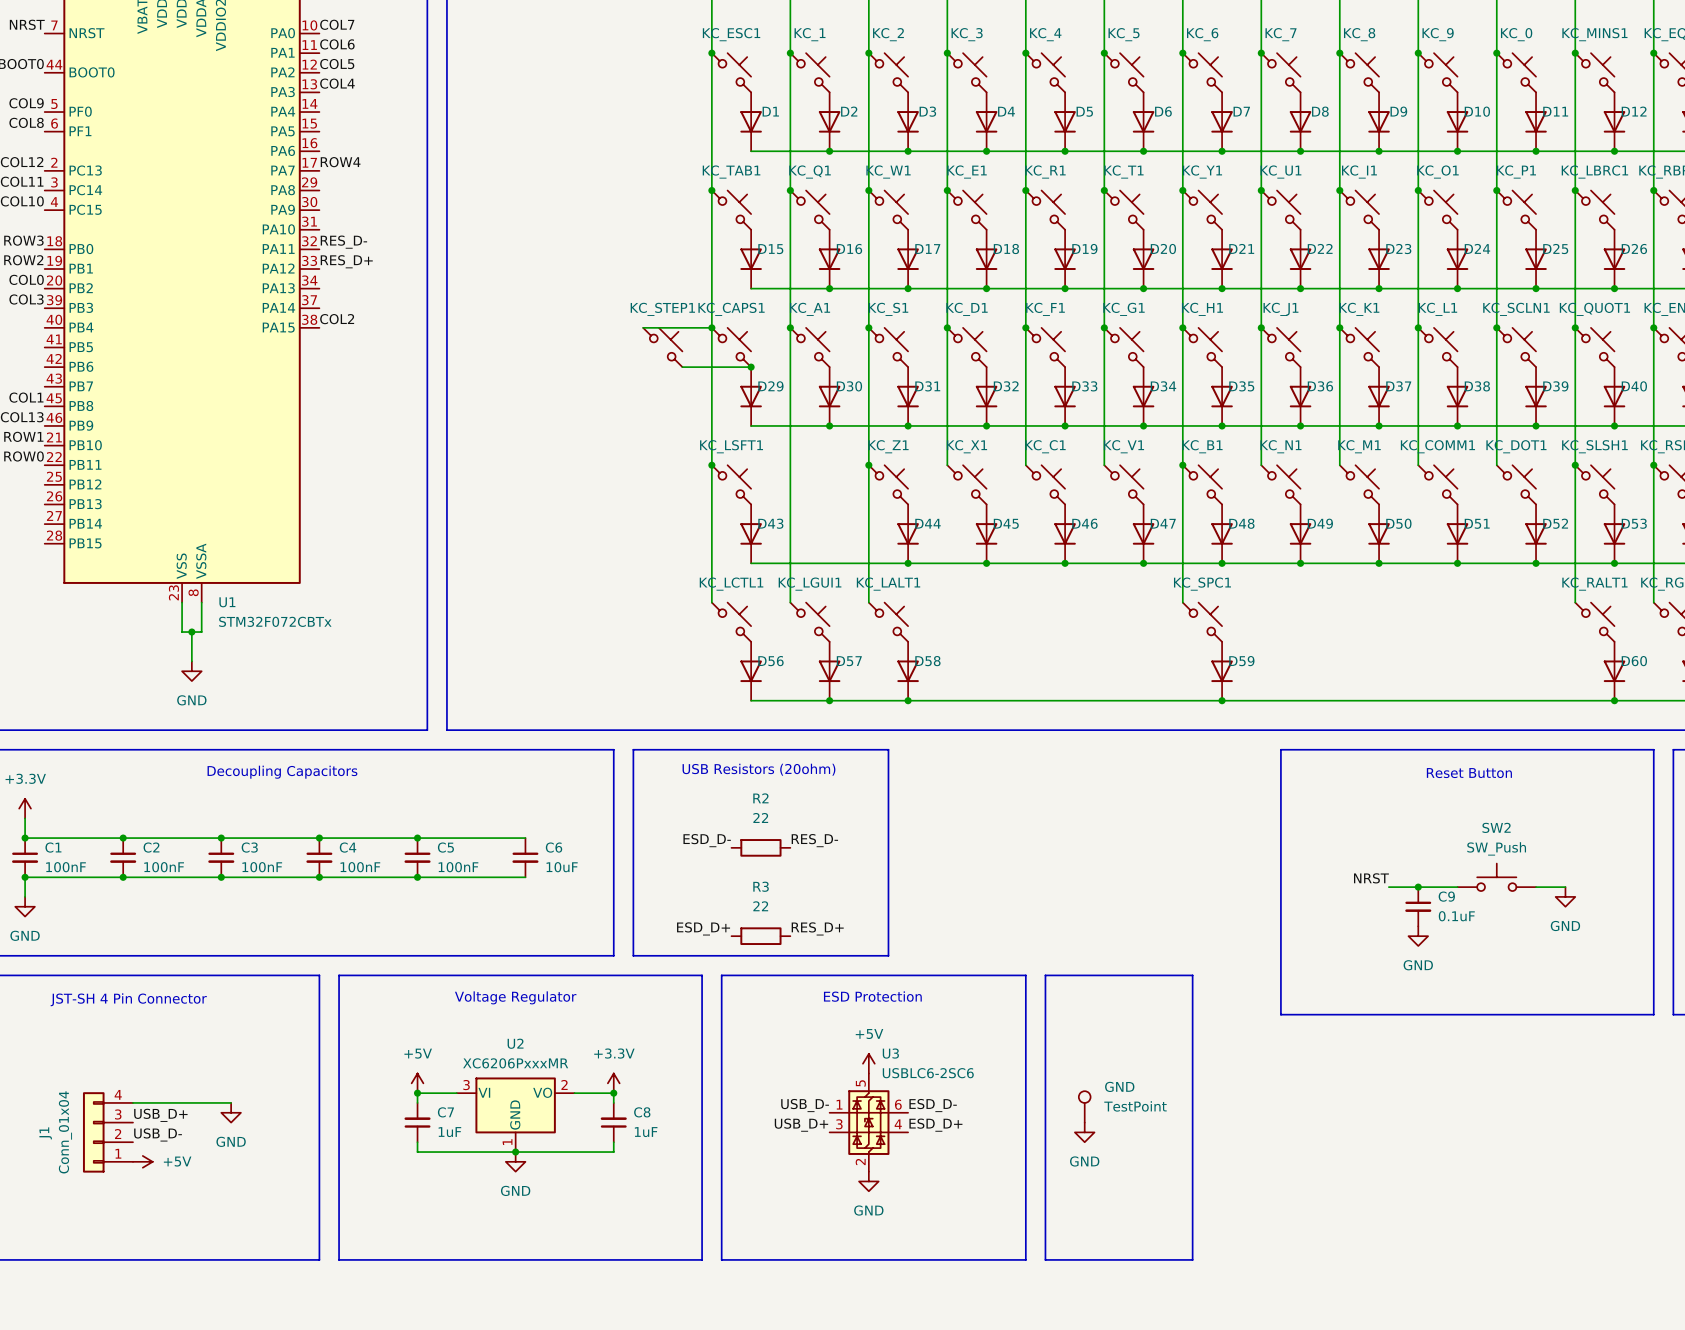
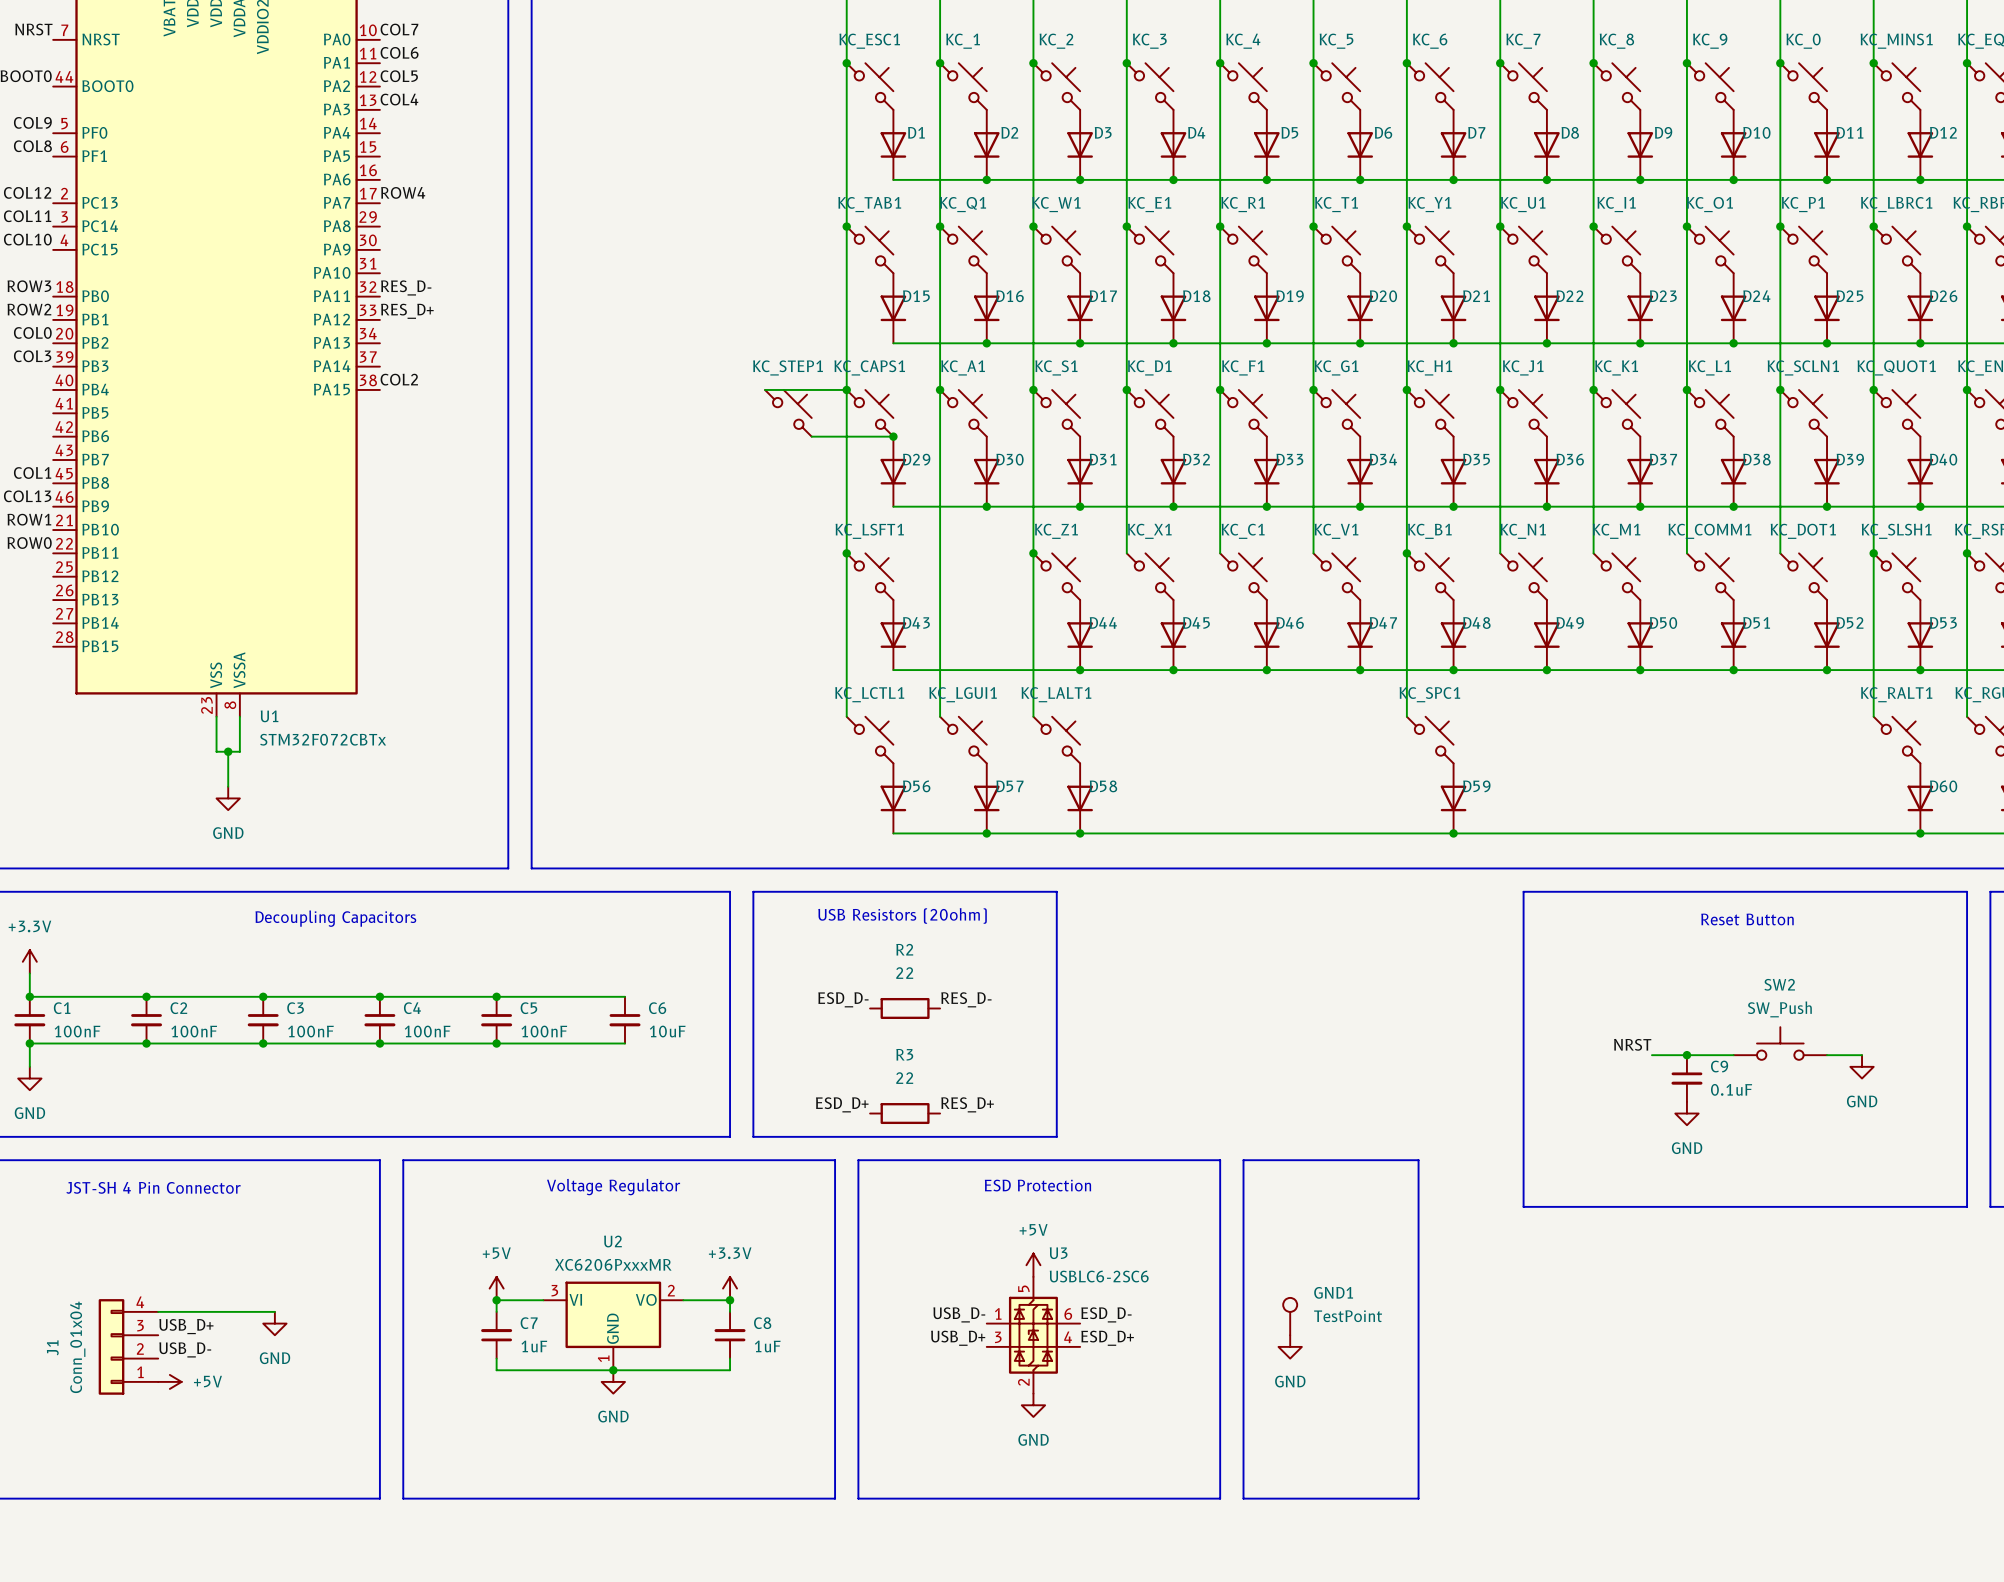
GND name: GND (1119, 1086) -> GND1 (1333, 1292)

